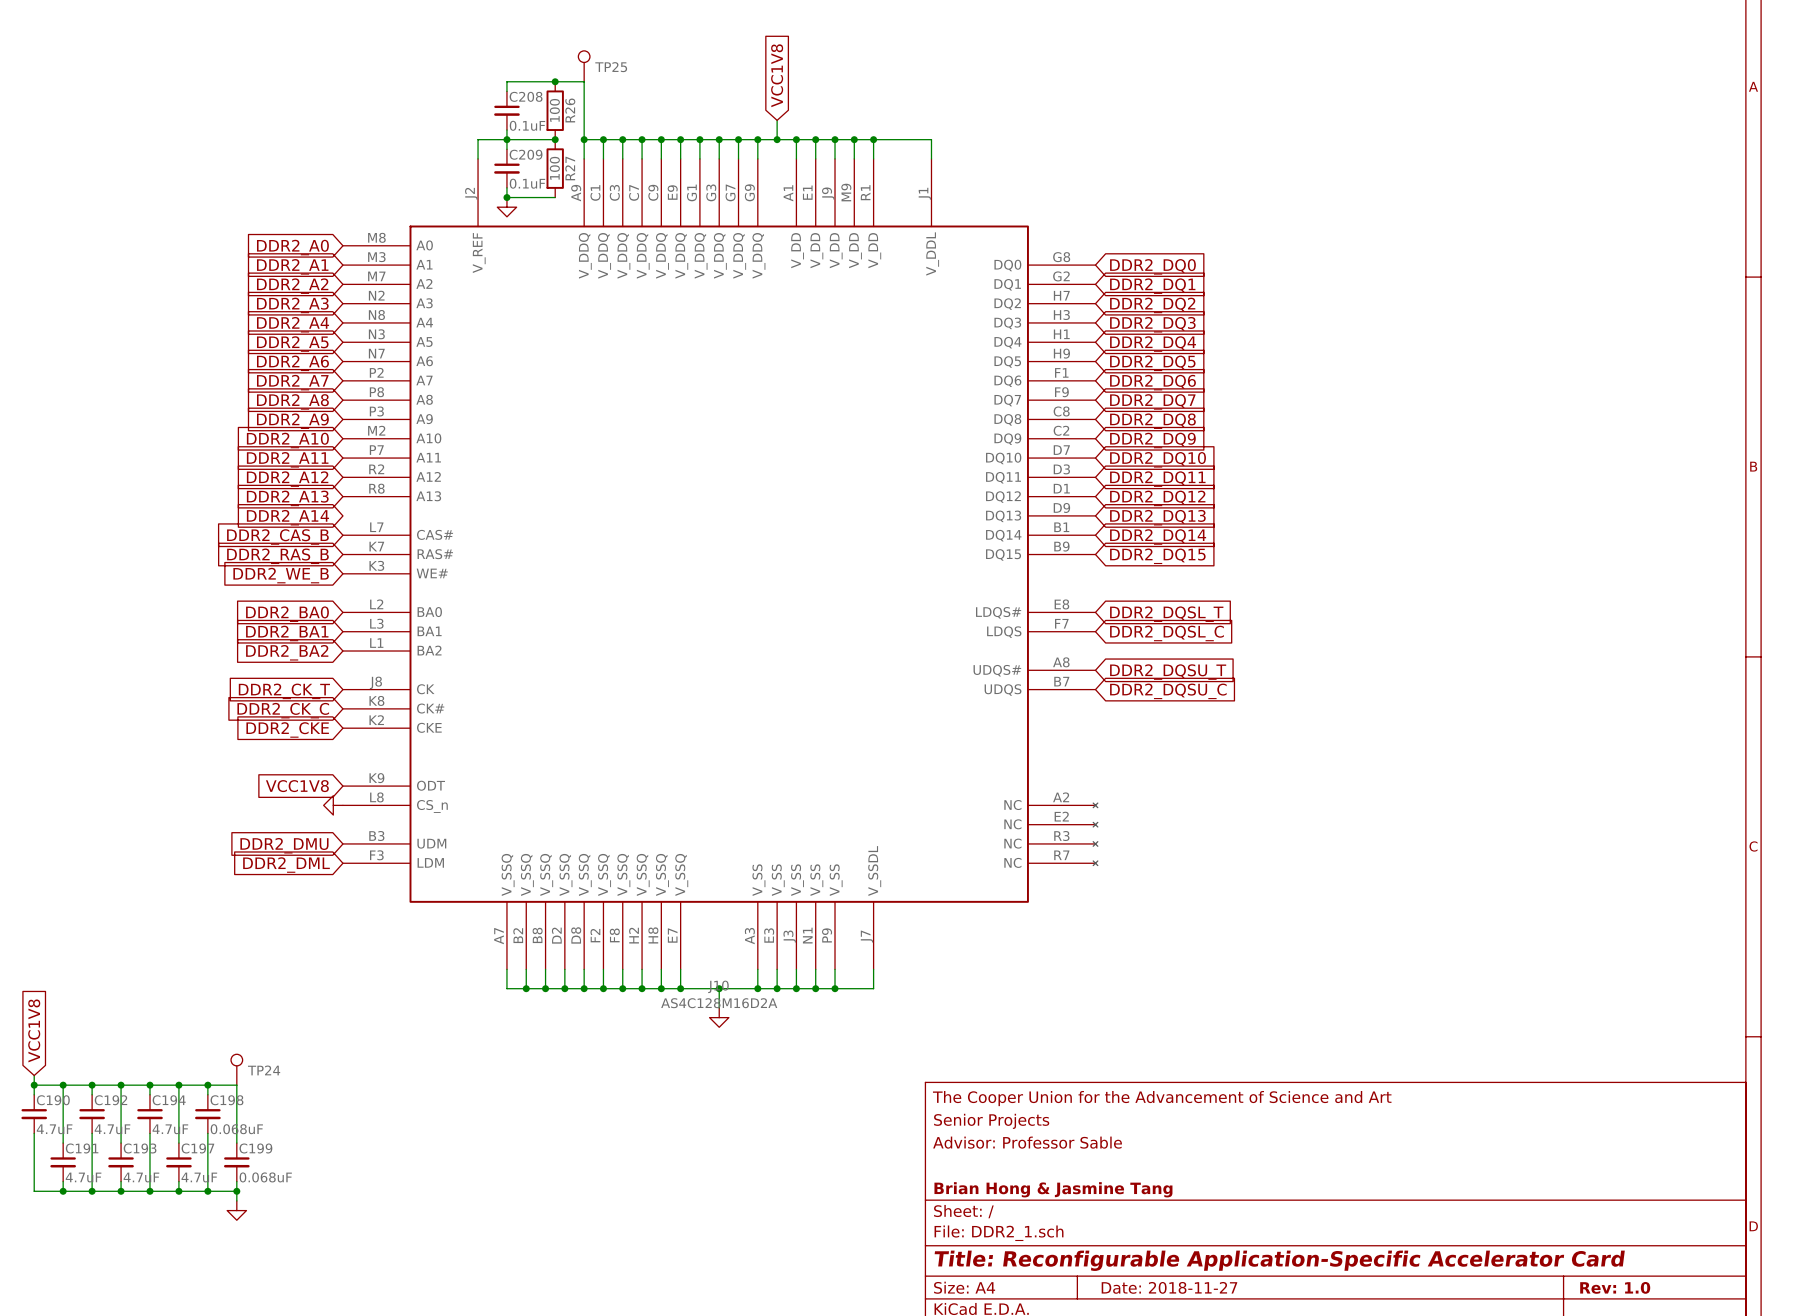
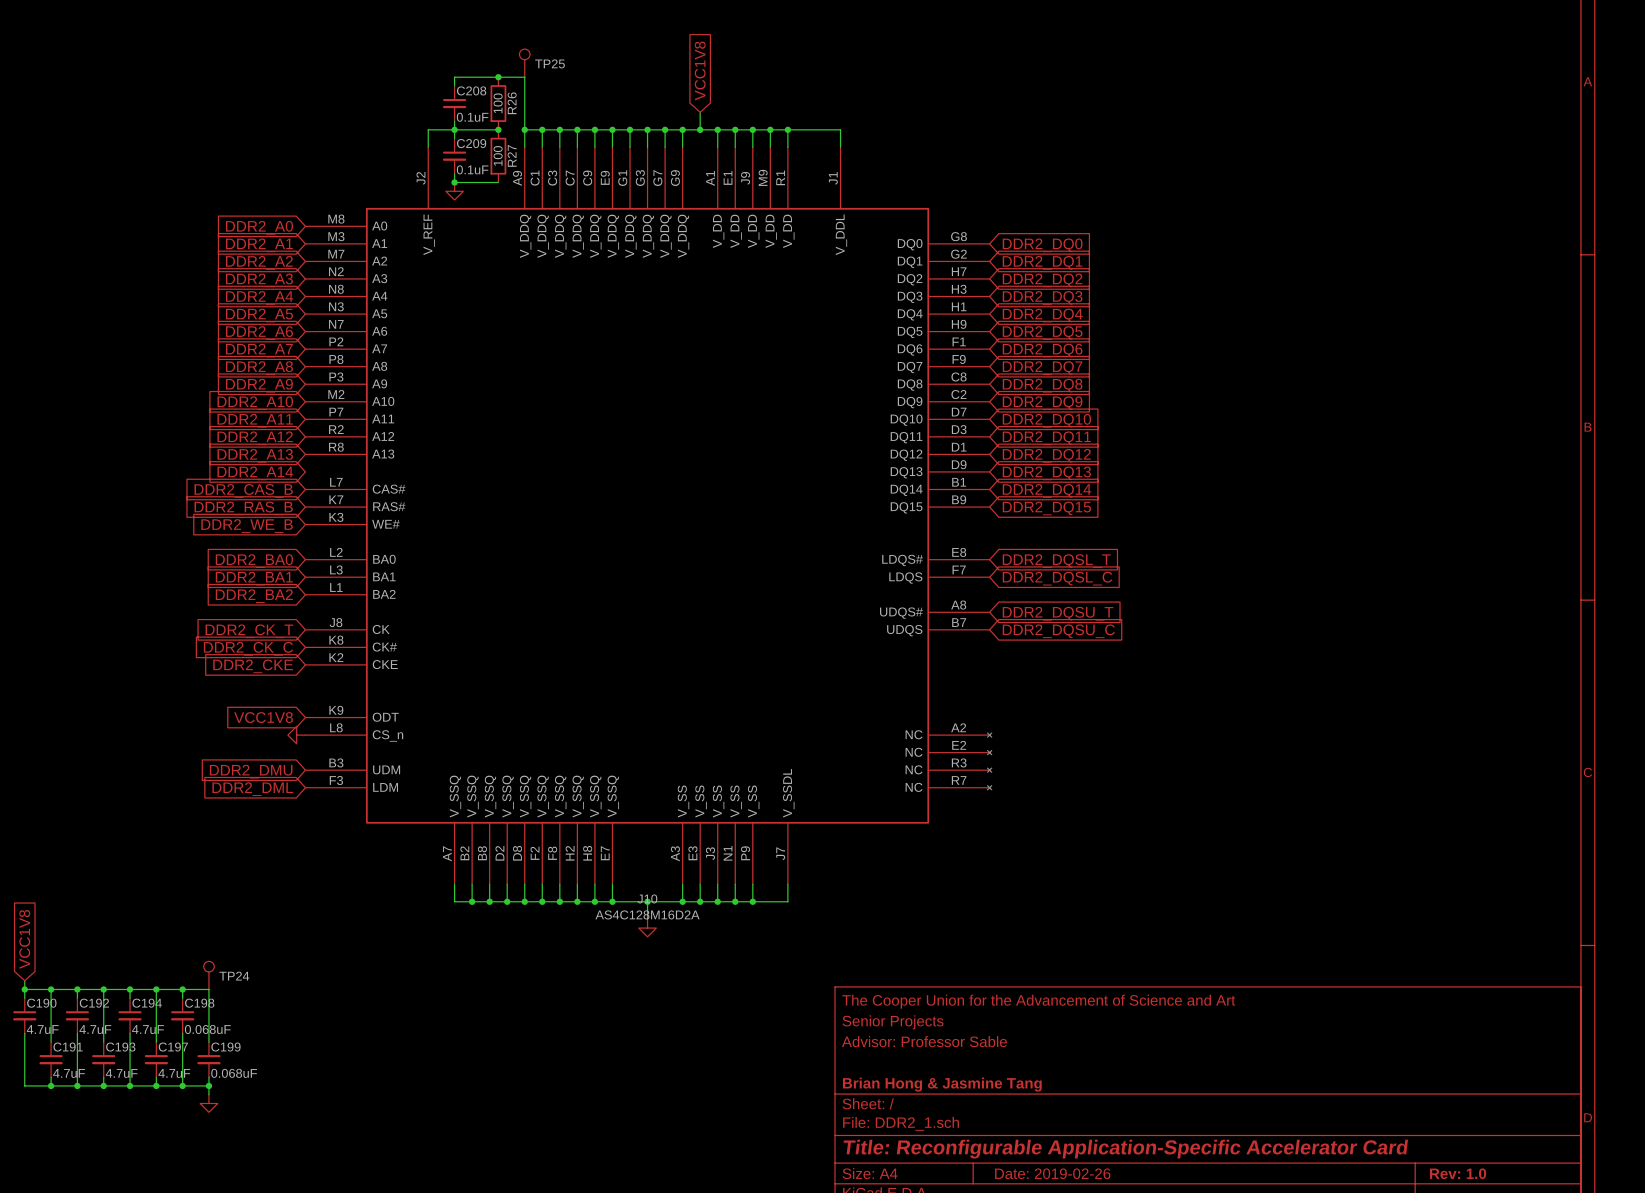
title block: Date: 2018-11-27 (1169, 1287) -> Date: 2019-02-26 (1052, 1173)

